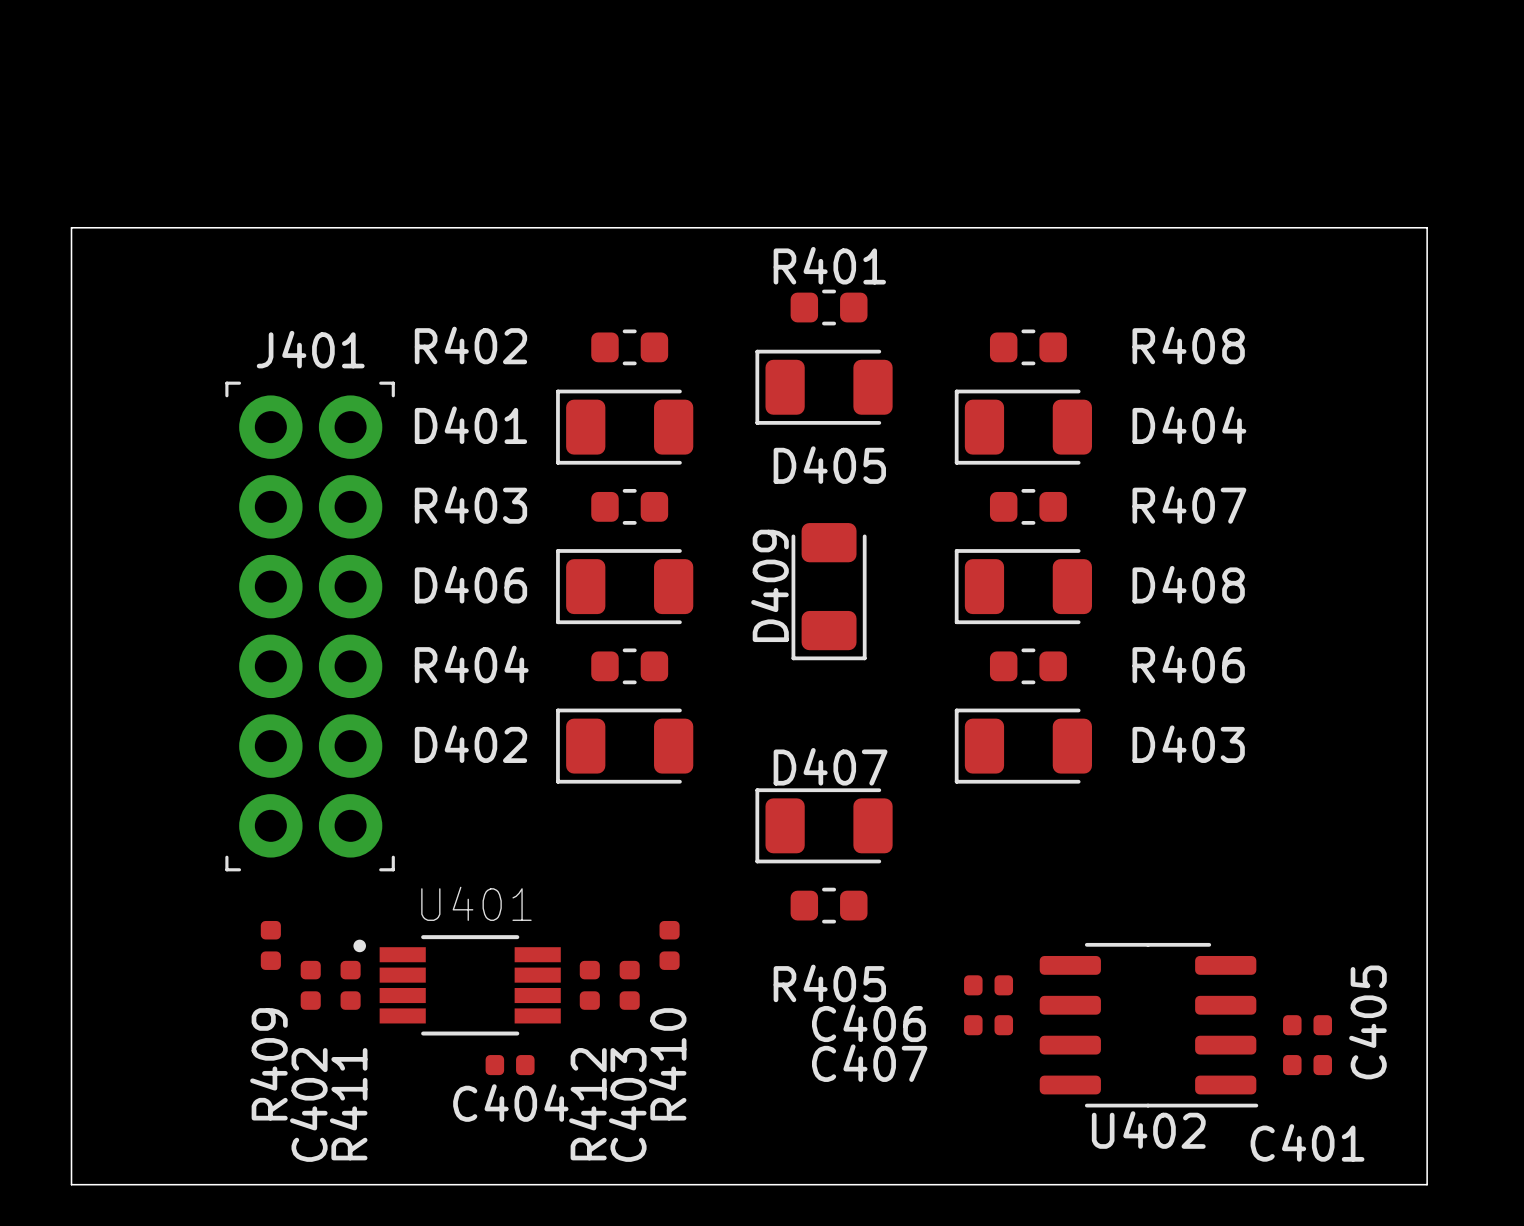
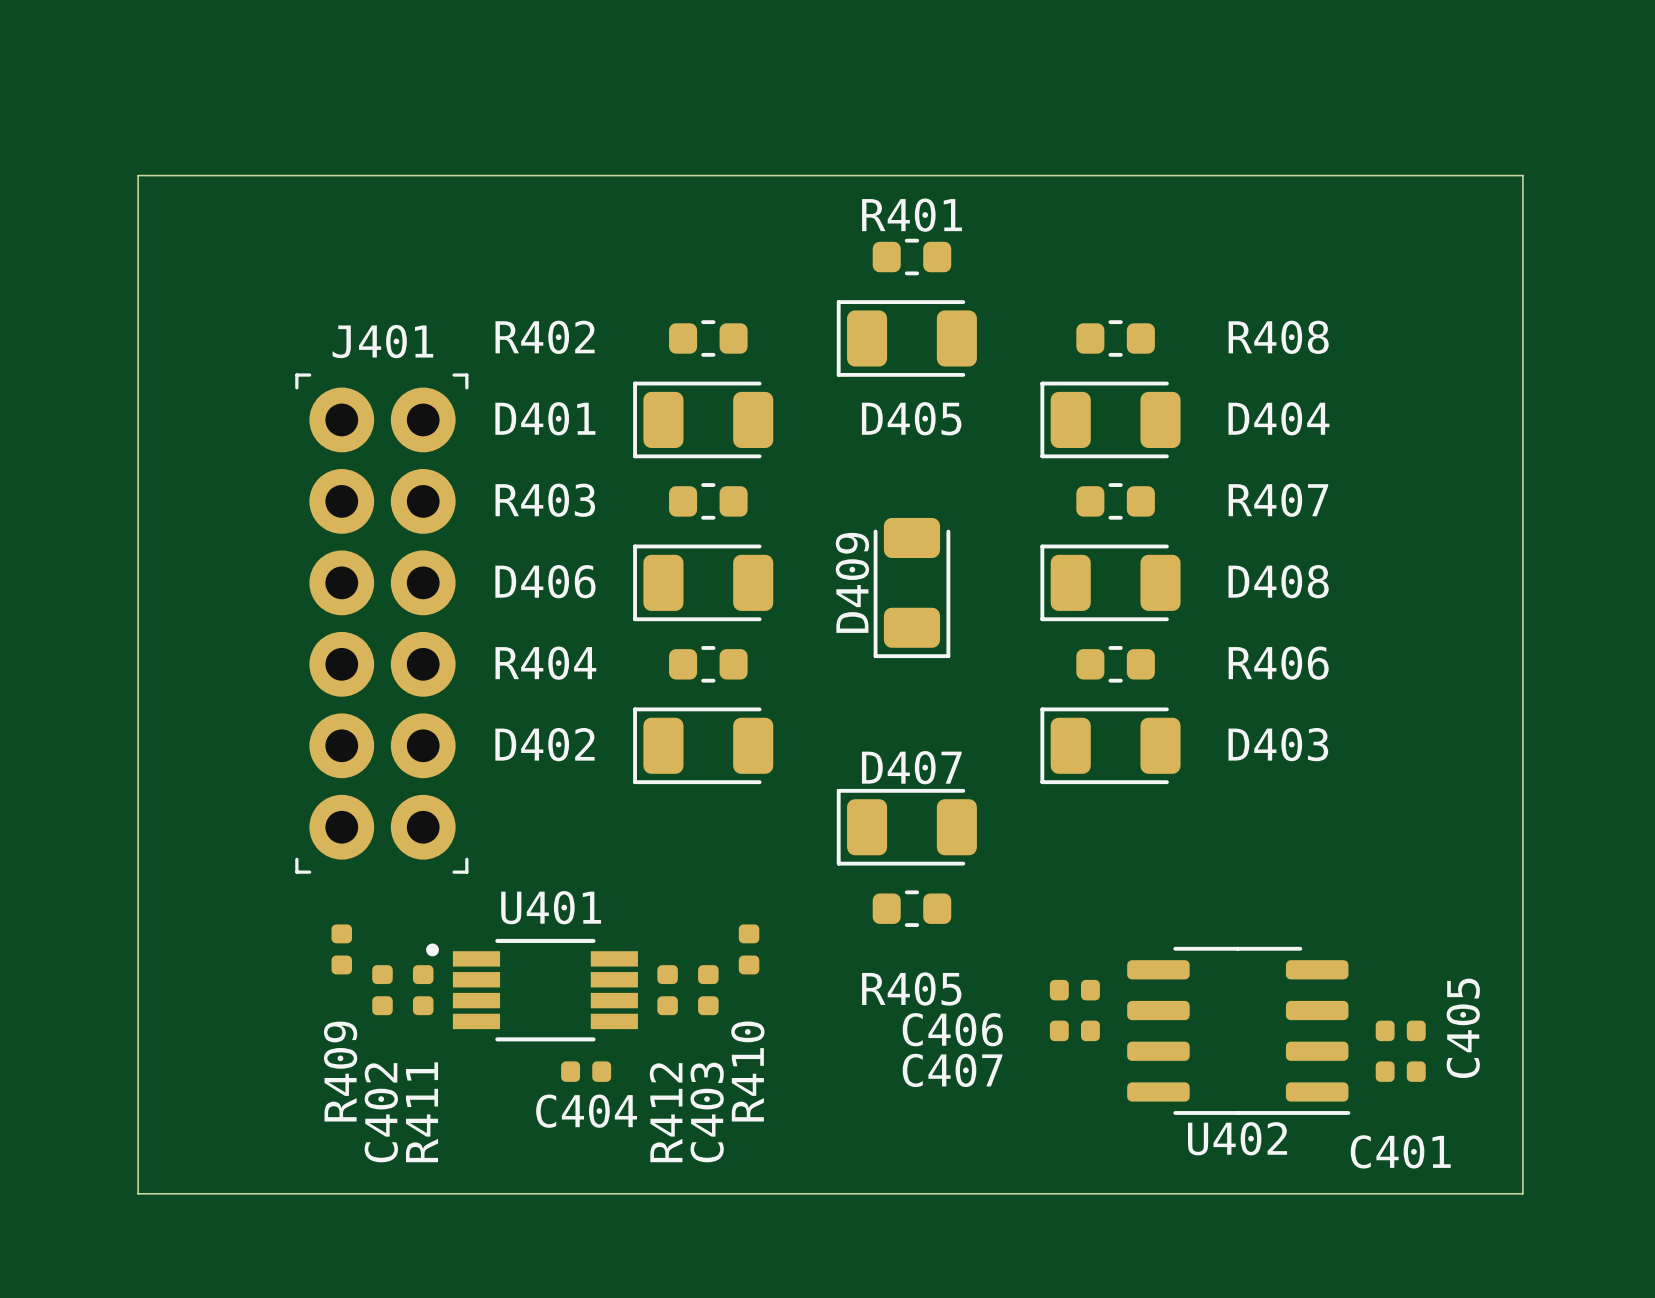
board edge: (71, 227) (1427, 227) -> (138, 216) (138, 175) (1522, 175) (1522, 216)
R401 position: (829, 307) -> (911, 257)
D405 position: (824, 387) -> (906, 338)

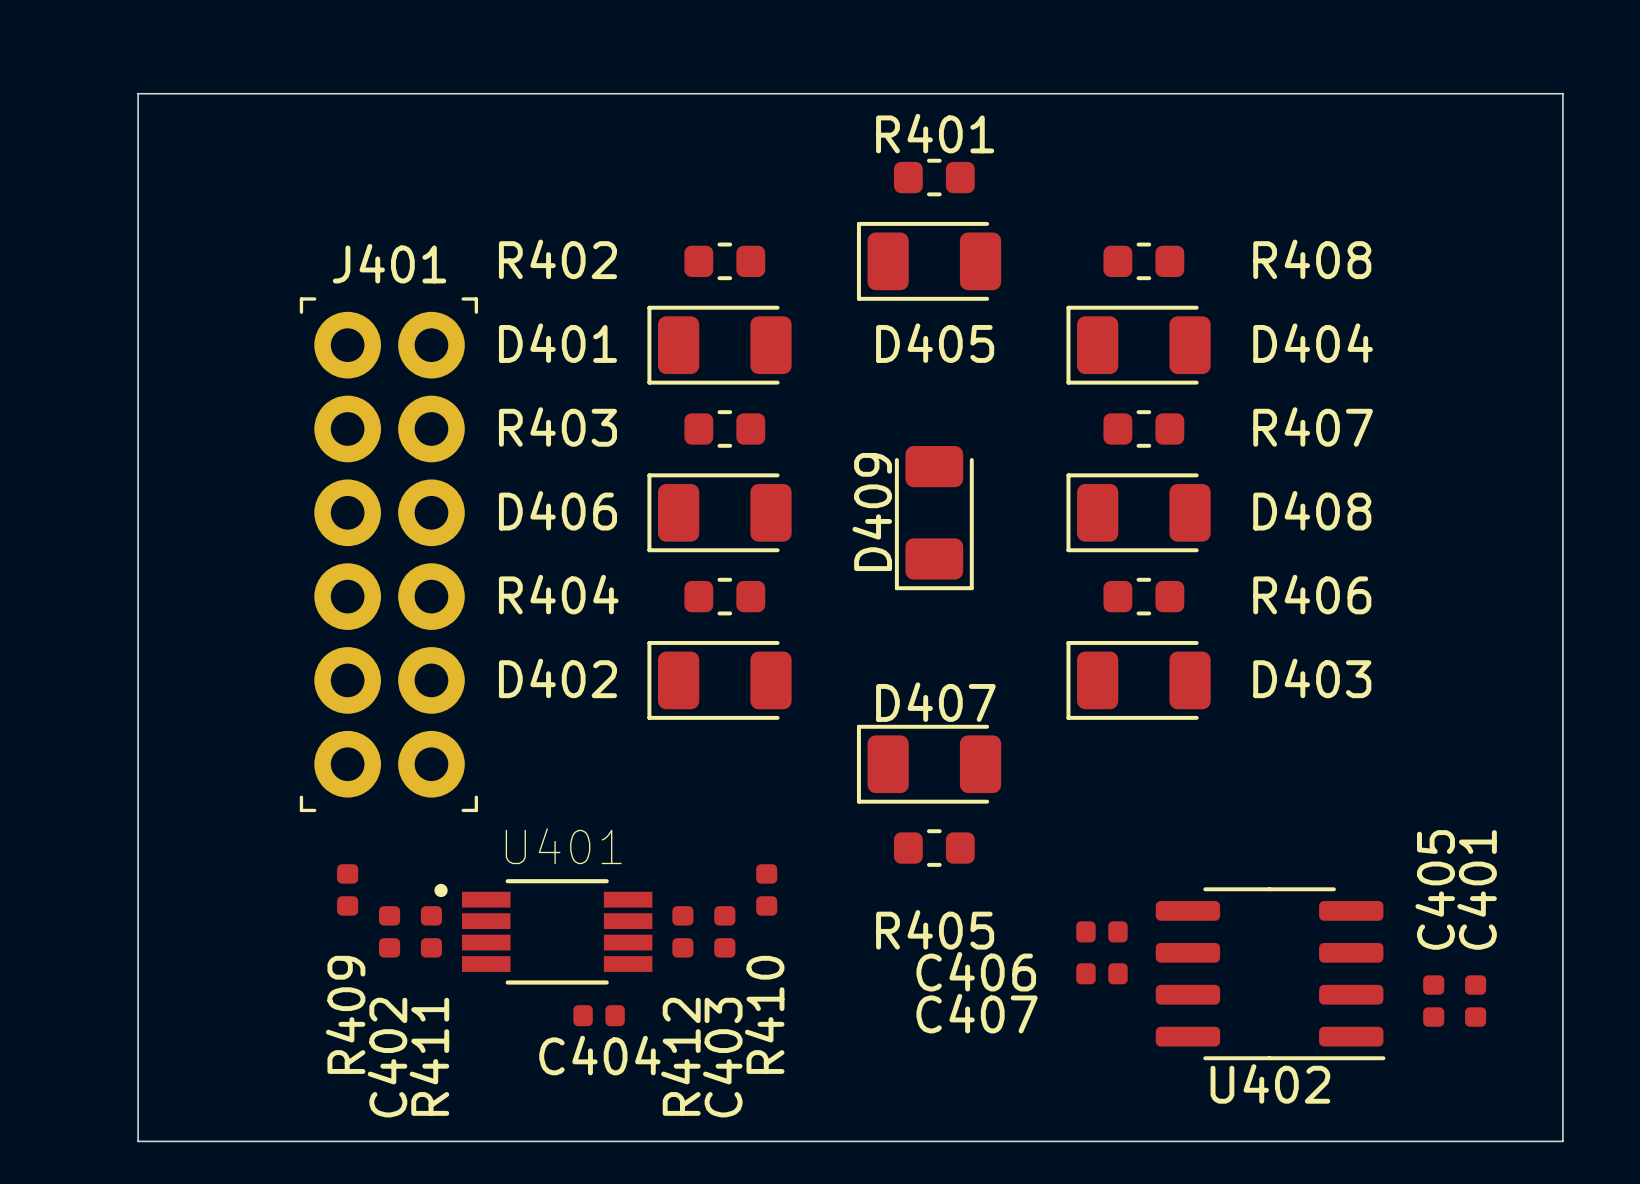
C405 name position: C405 (1463, 1028) -> C405 (1435, 889)
C405 rotation: 0° (1400, 1030) -> 90° clockwise (1433, 1001)
C401 rotation: 0° (1400, 1071) -> 90° clockwise (1475, 1001)
C401 position: (1400, 1071) -> (1475, 1001)
C401 name position: C401 (1400, 1151) -> C401 (1477, 889)

